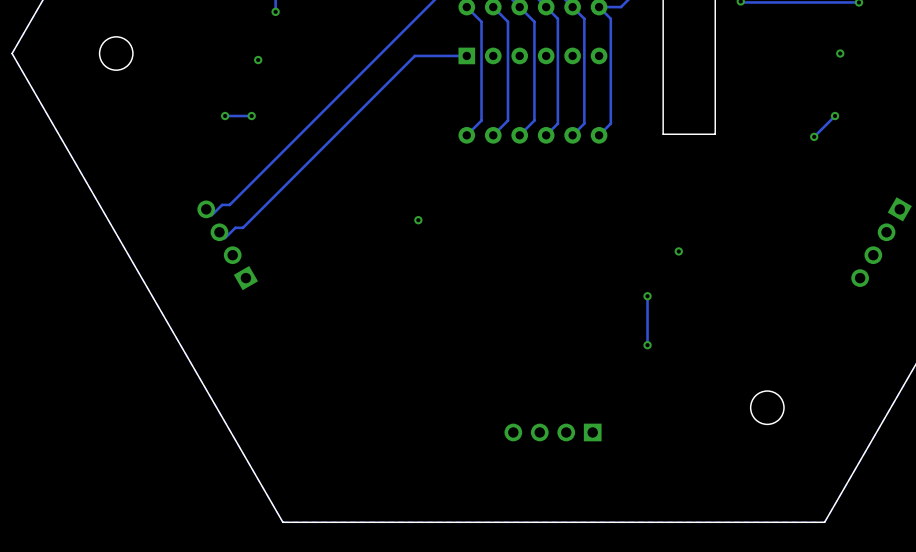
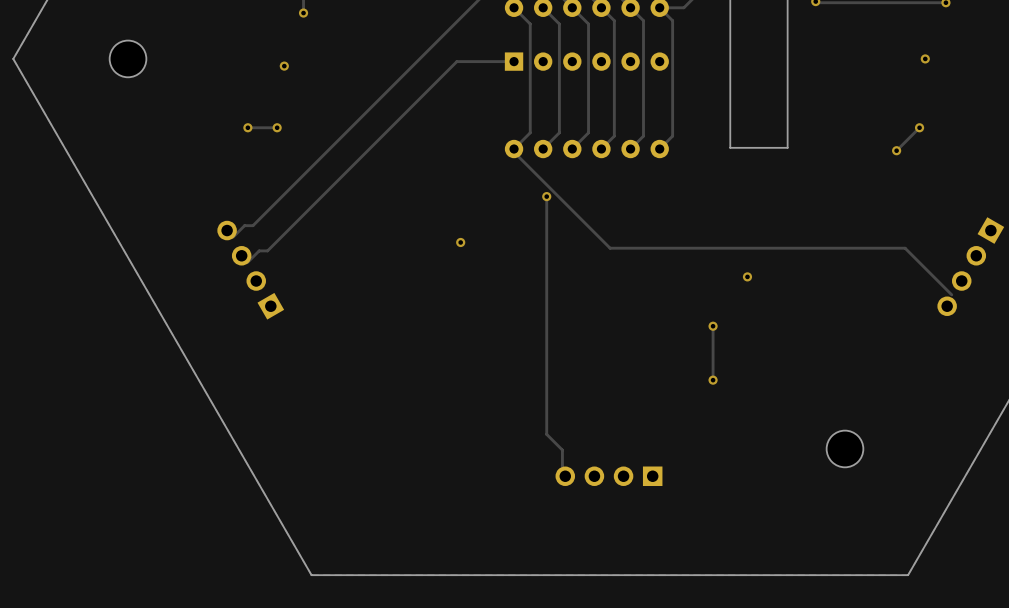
track: none -> (514, 152) (610, 248) (905, 248) (951, 294)
track: none -> (546, 196) (546, 434) (562, 450) (562, 473)
via: none -> (546, 196)

